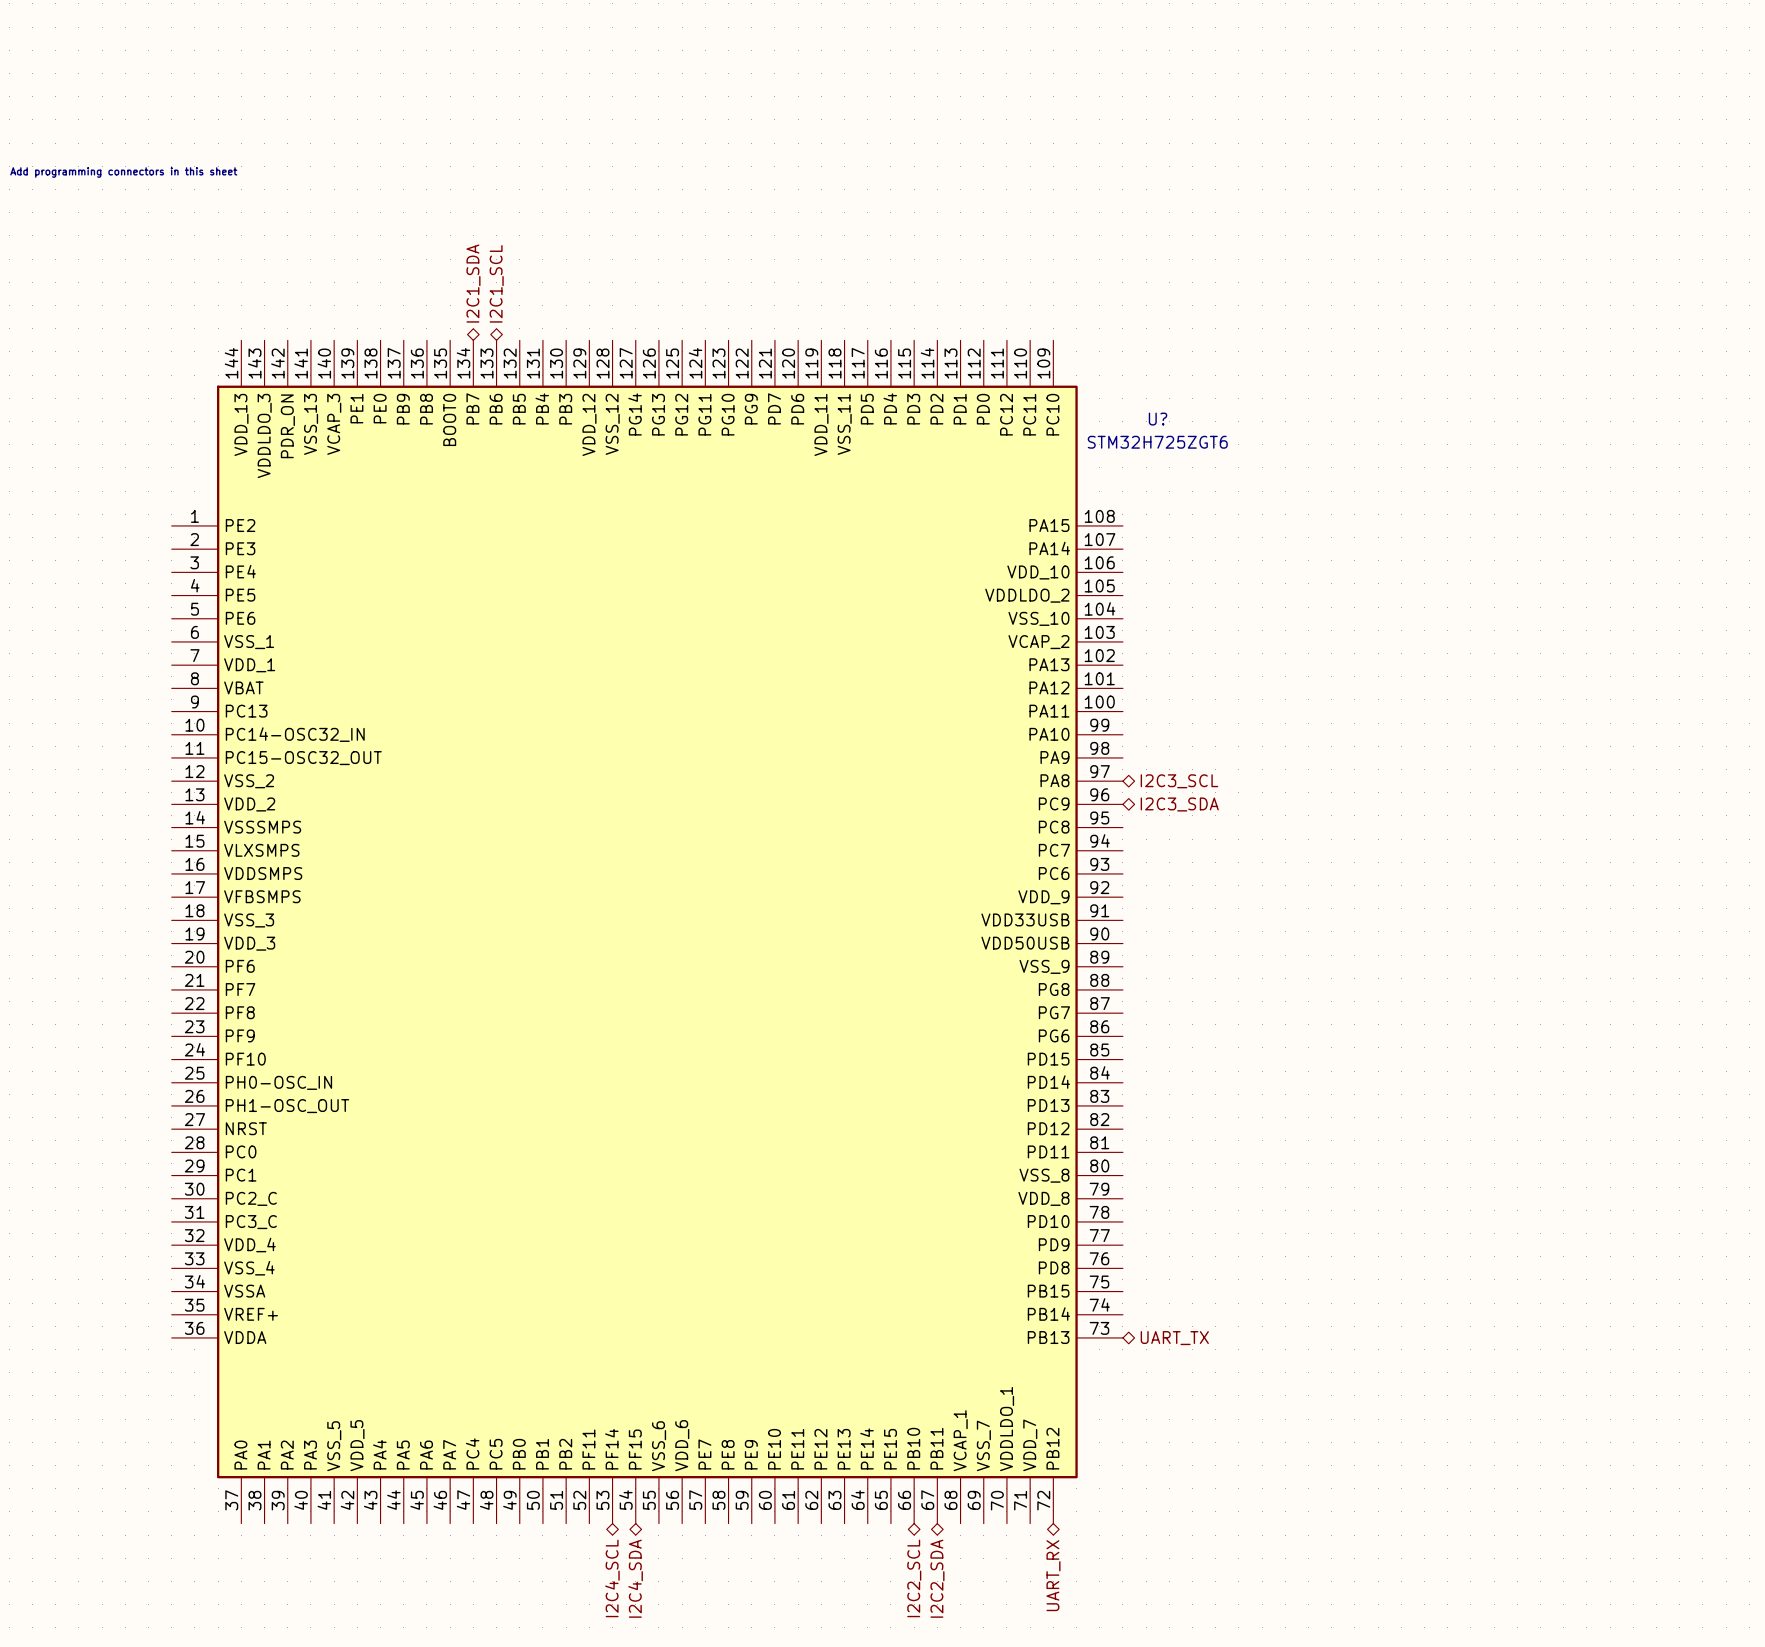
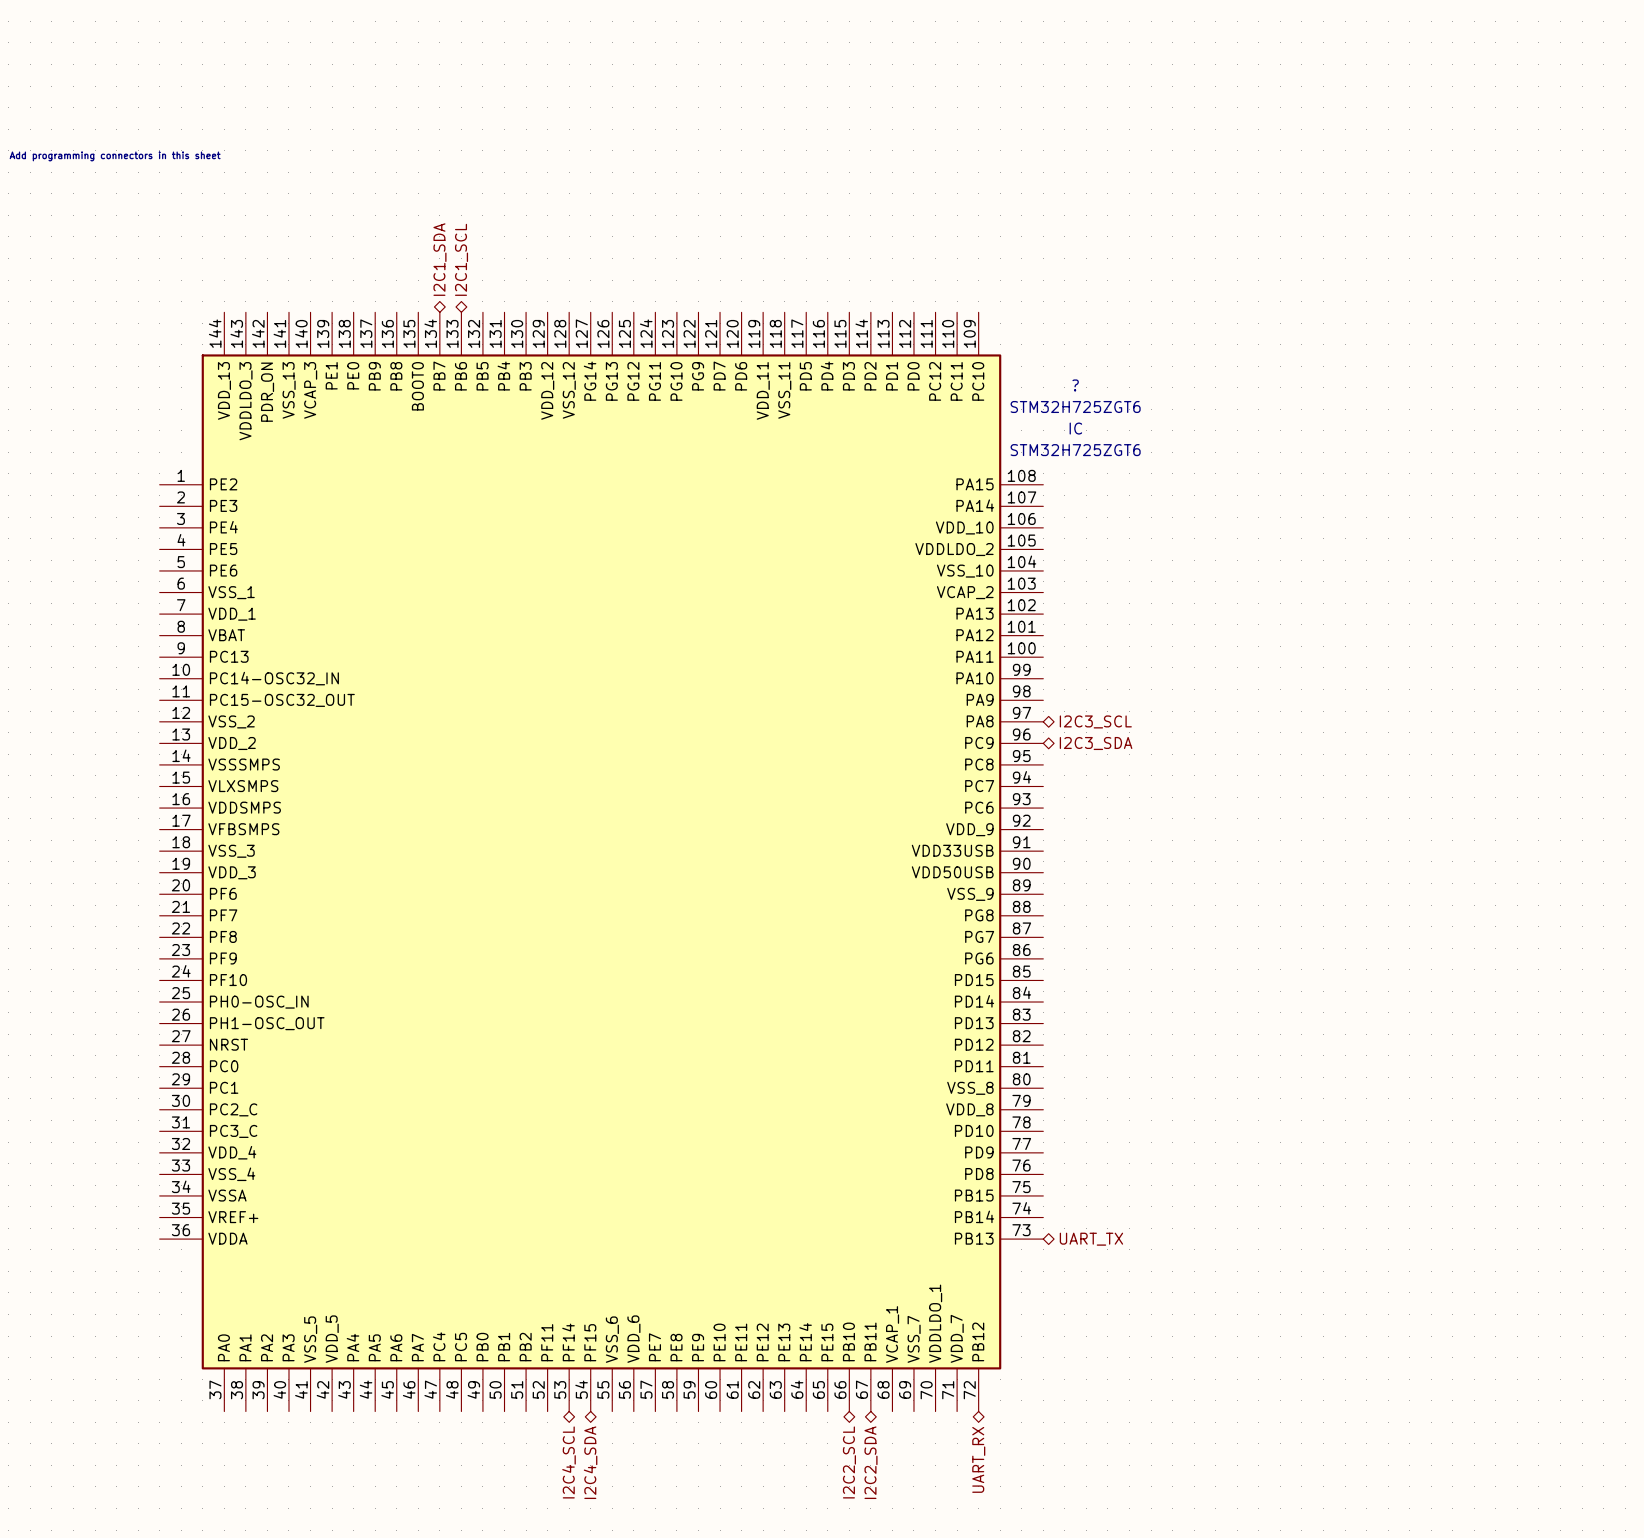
U? name: U? (1158, 419) -> ? (1075, 385)
U? text: none -> IC (1075, 428)
U? text: none -> STM32H725ZGT6 (1075, 450)

